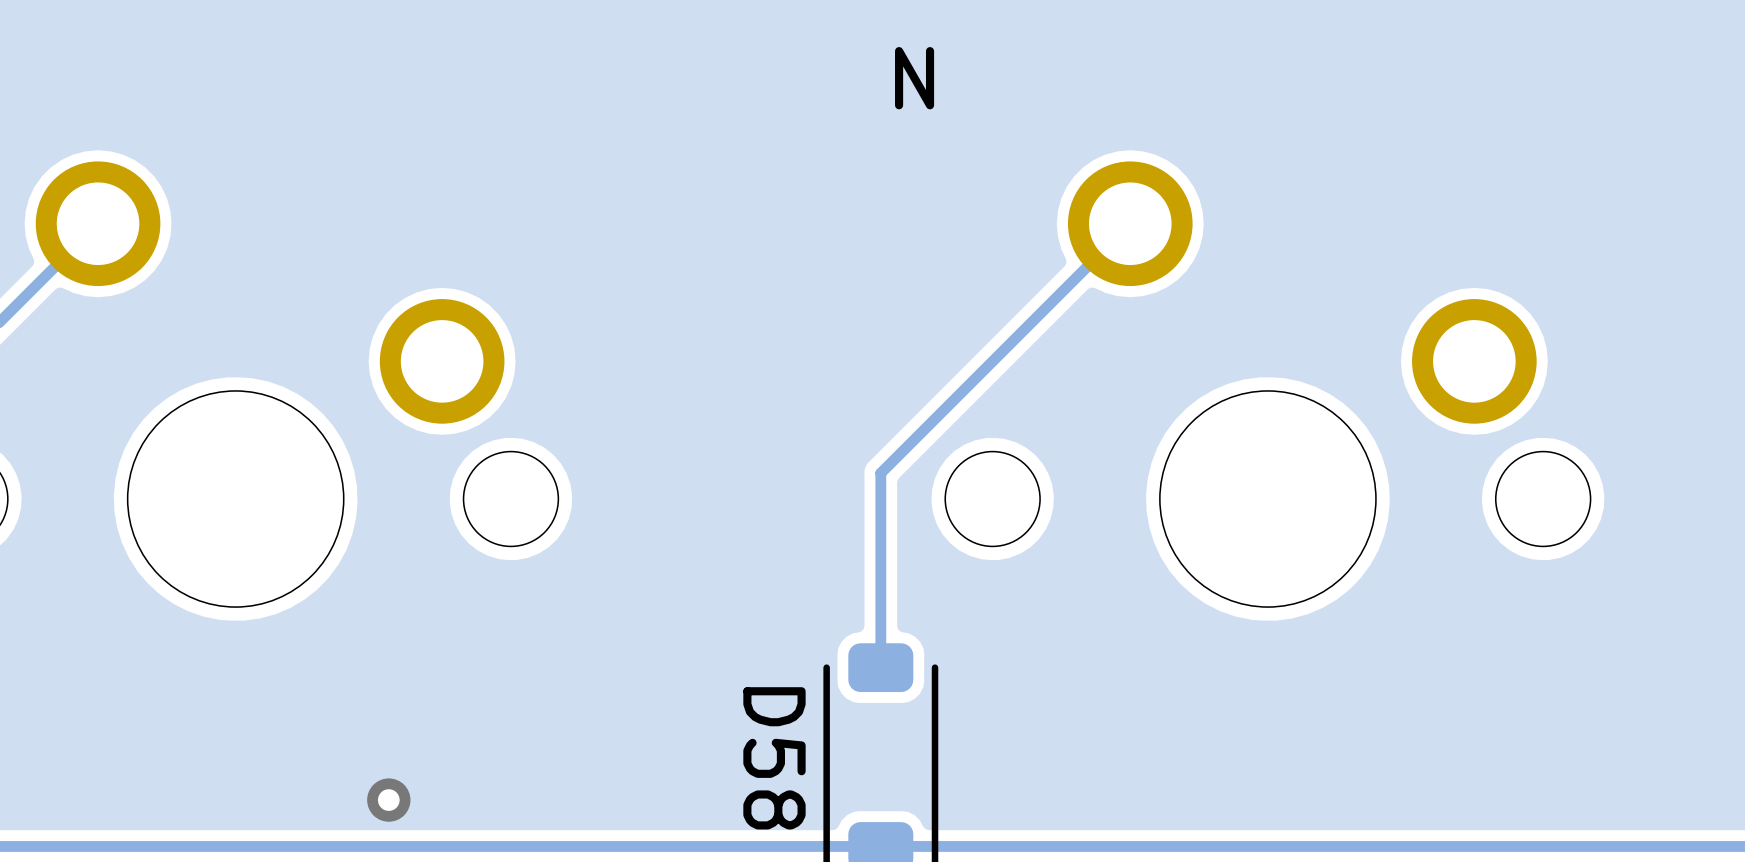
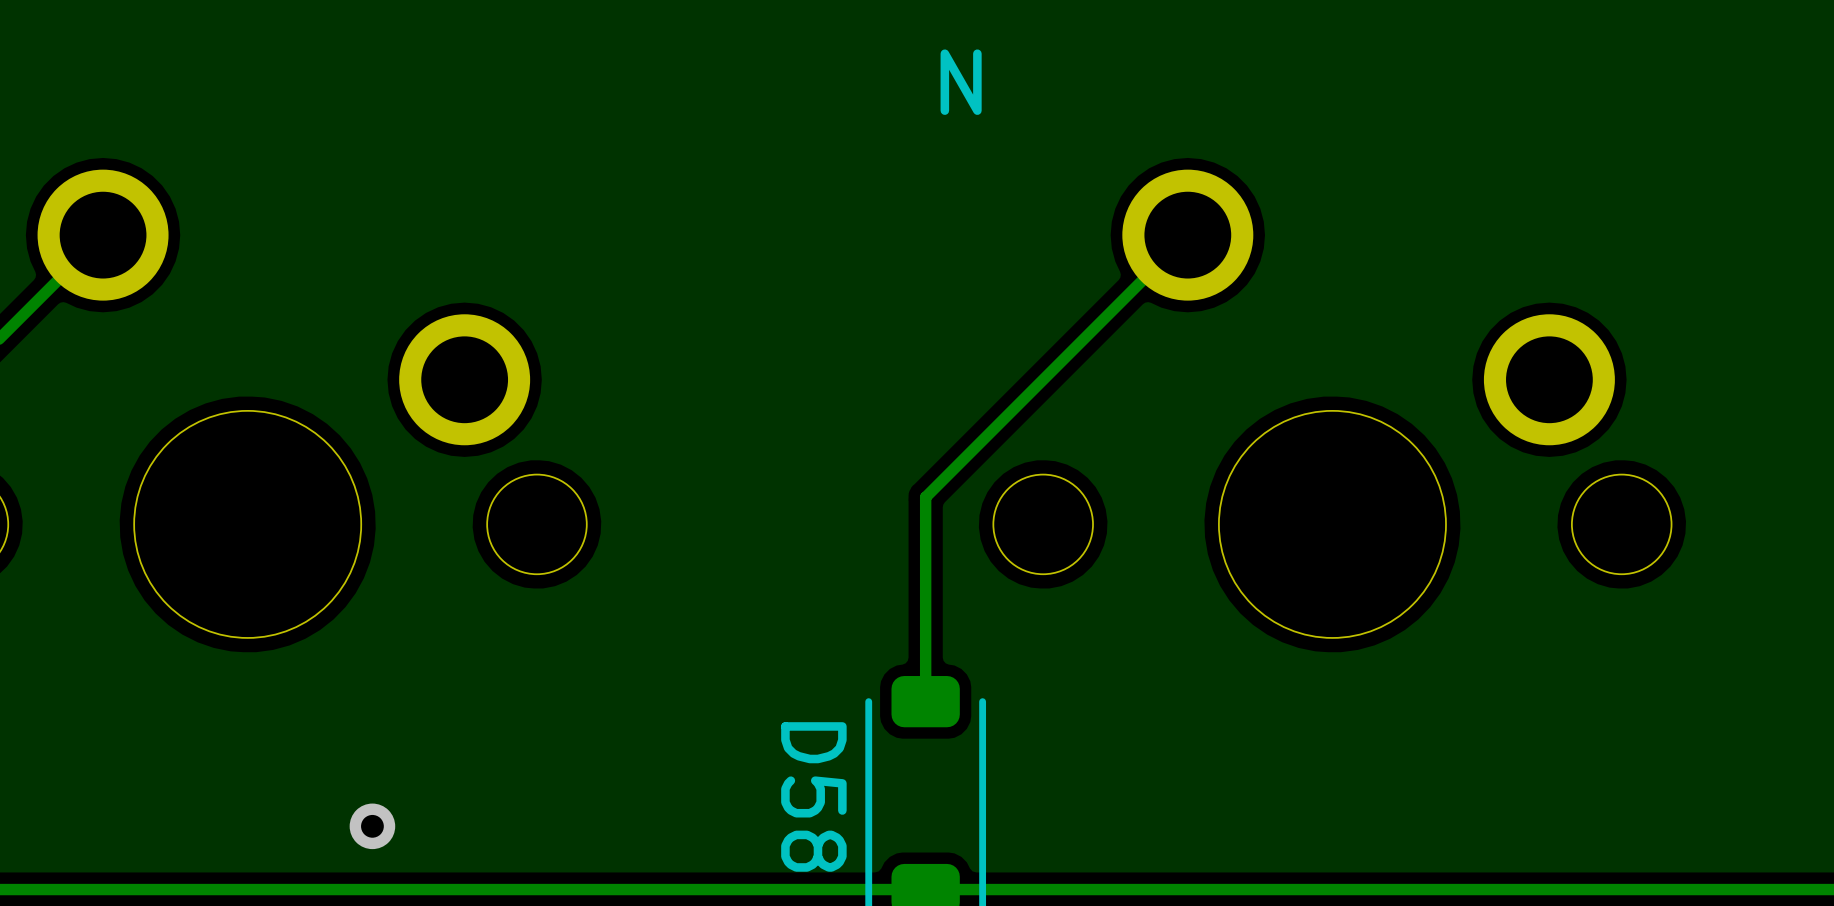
via position: (388, 800) -> (372, 826)

